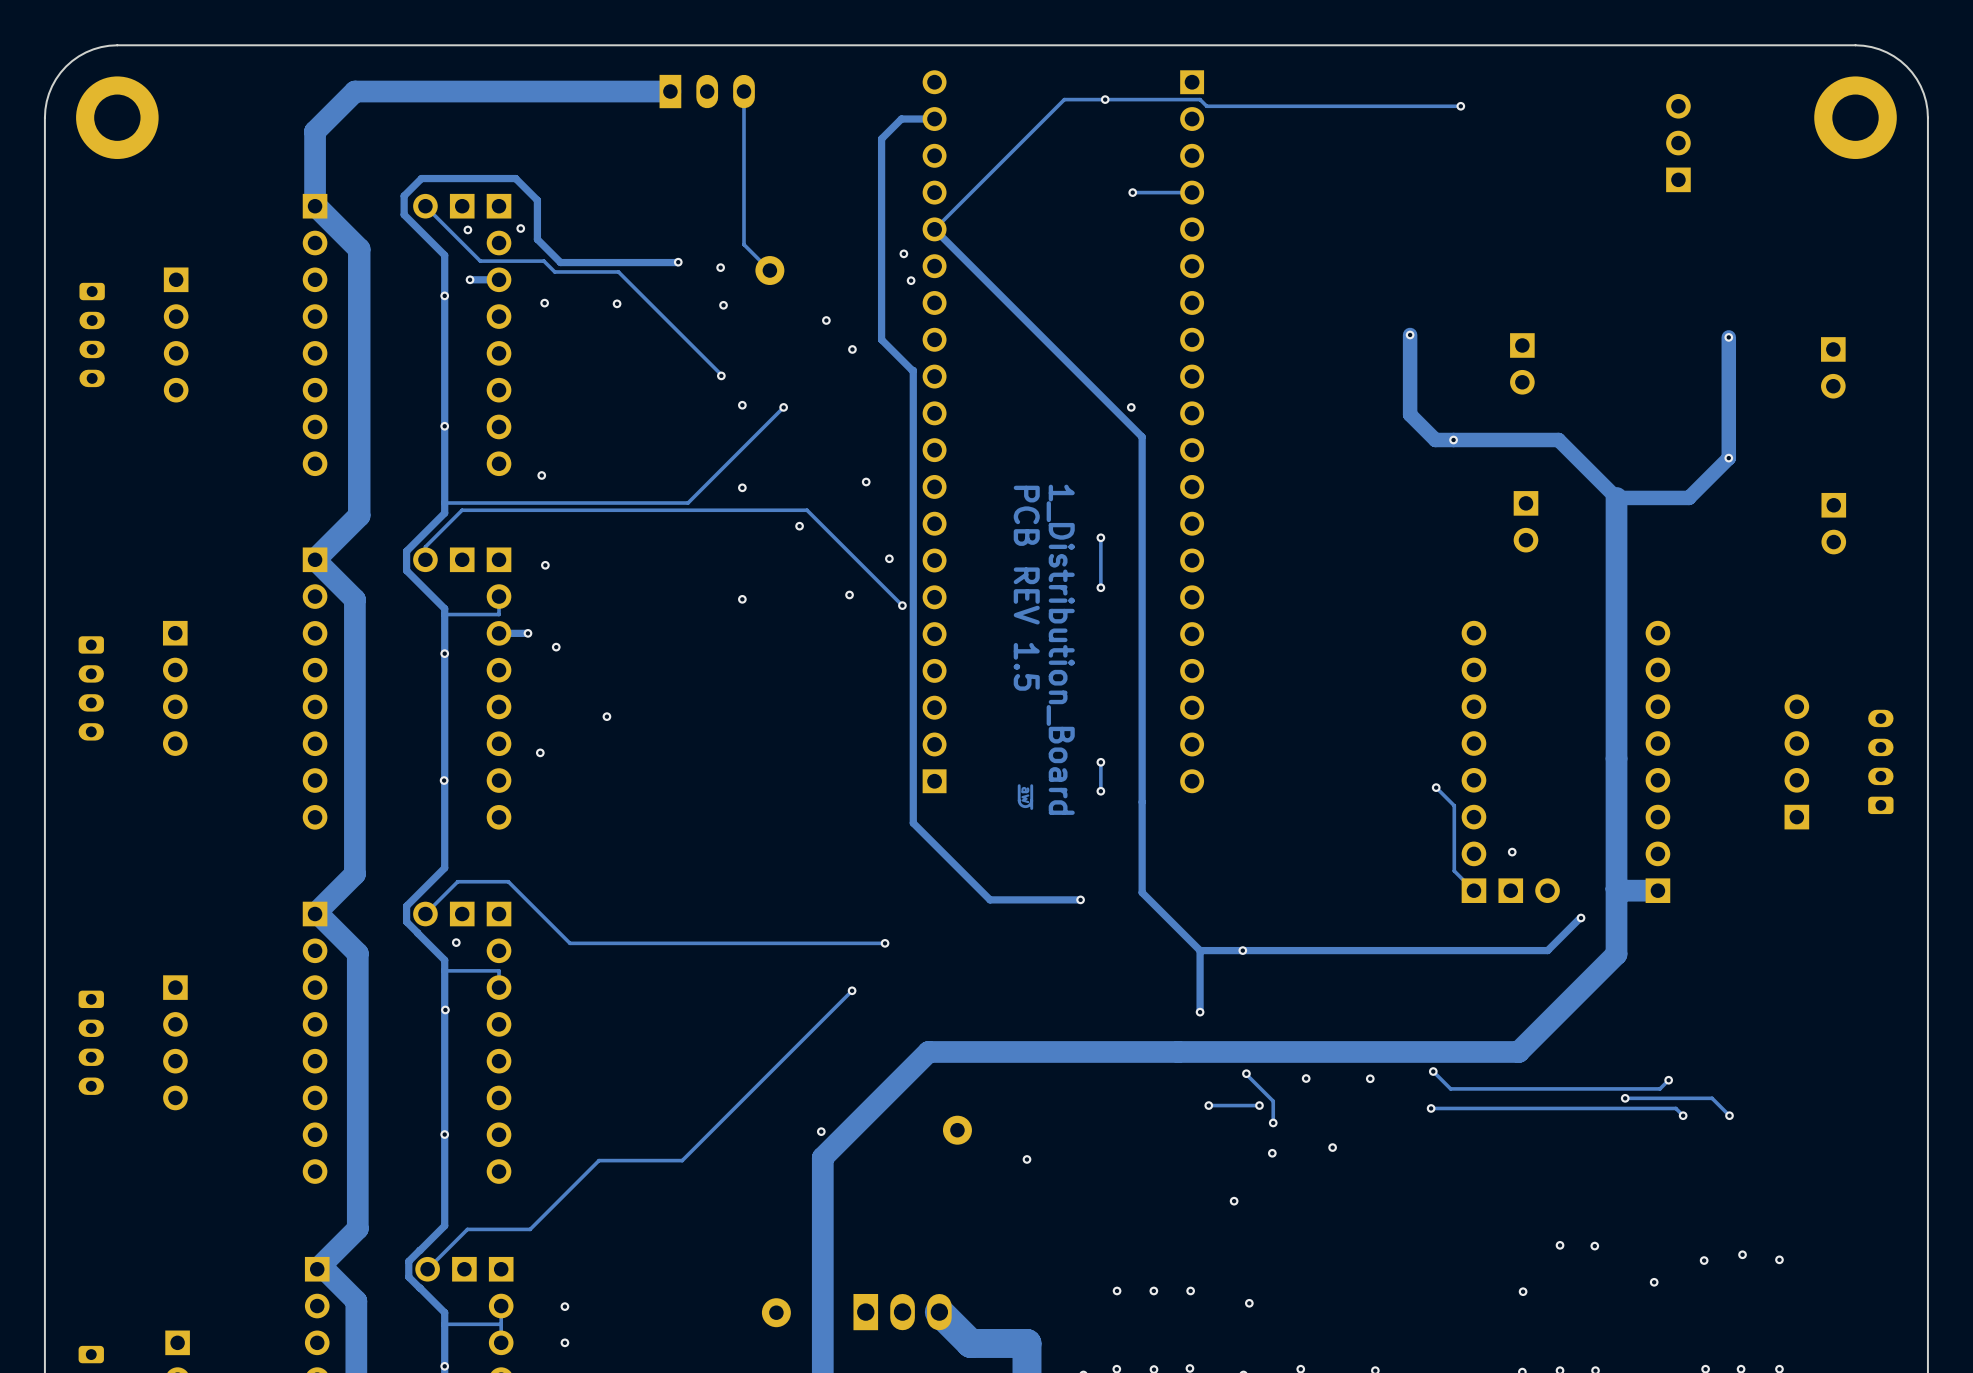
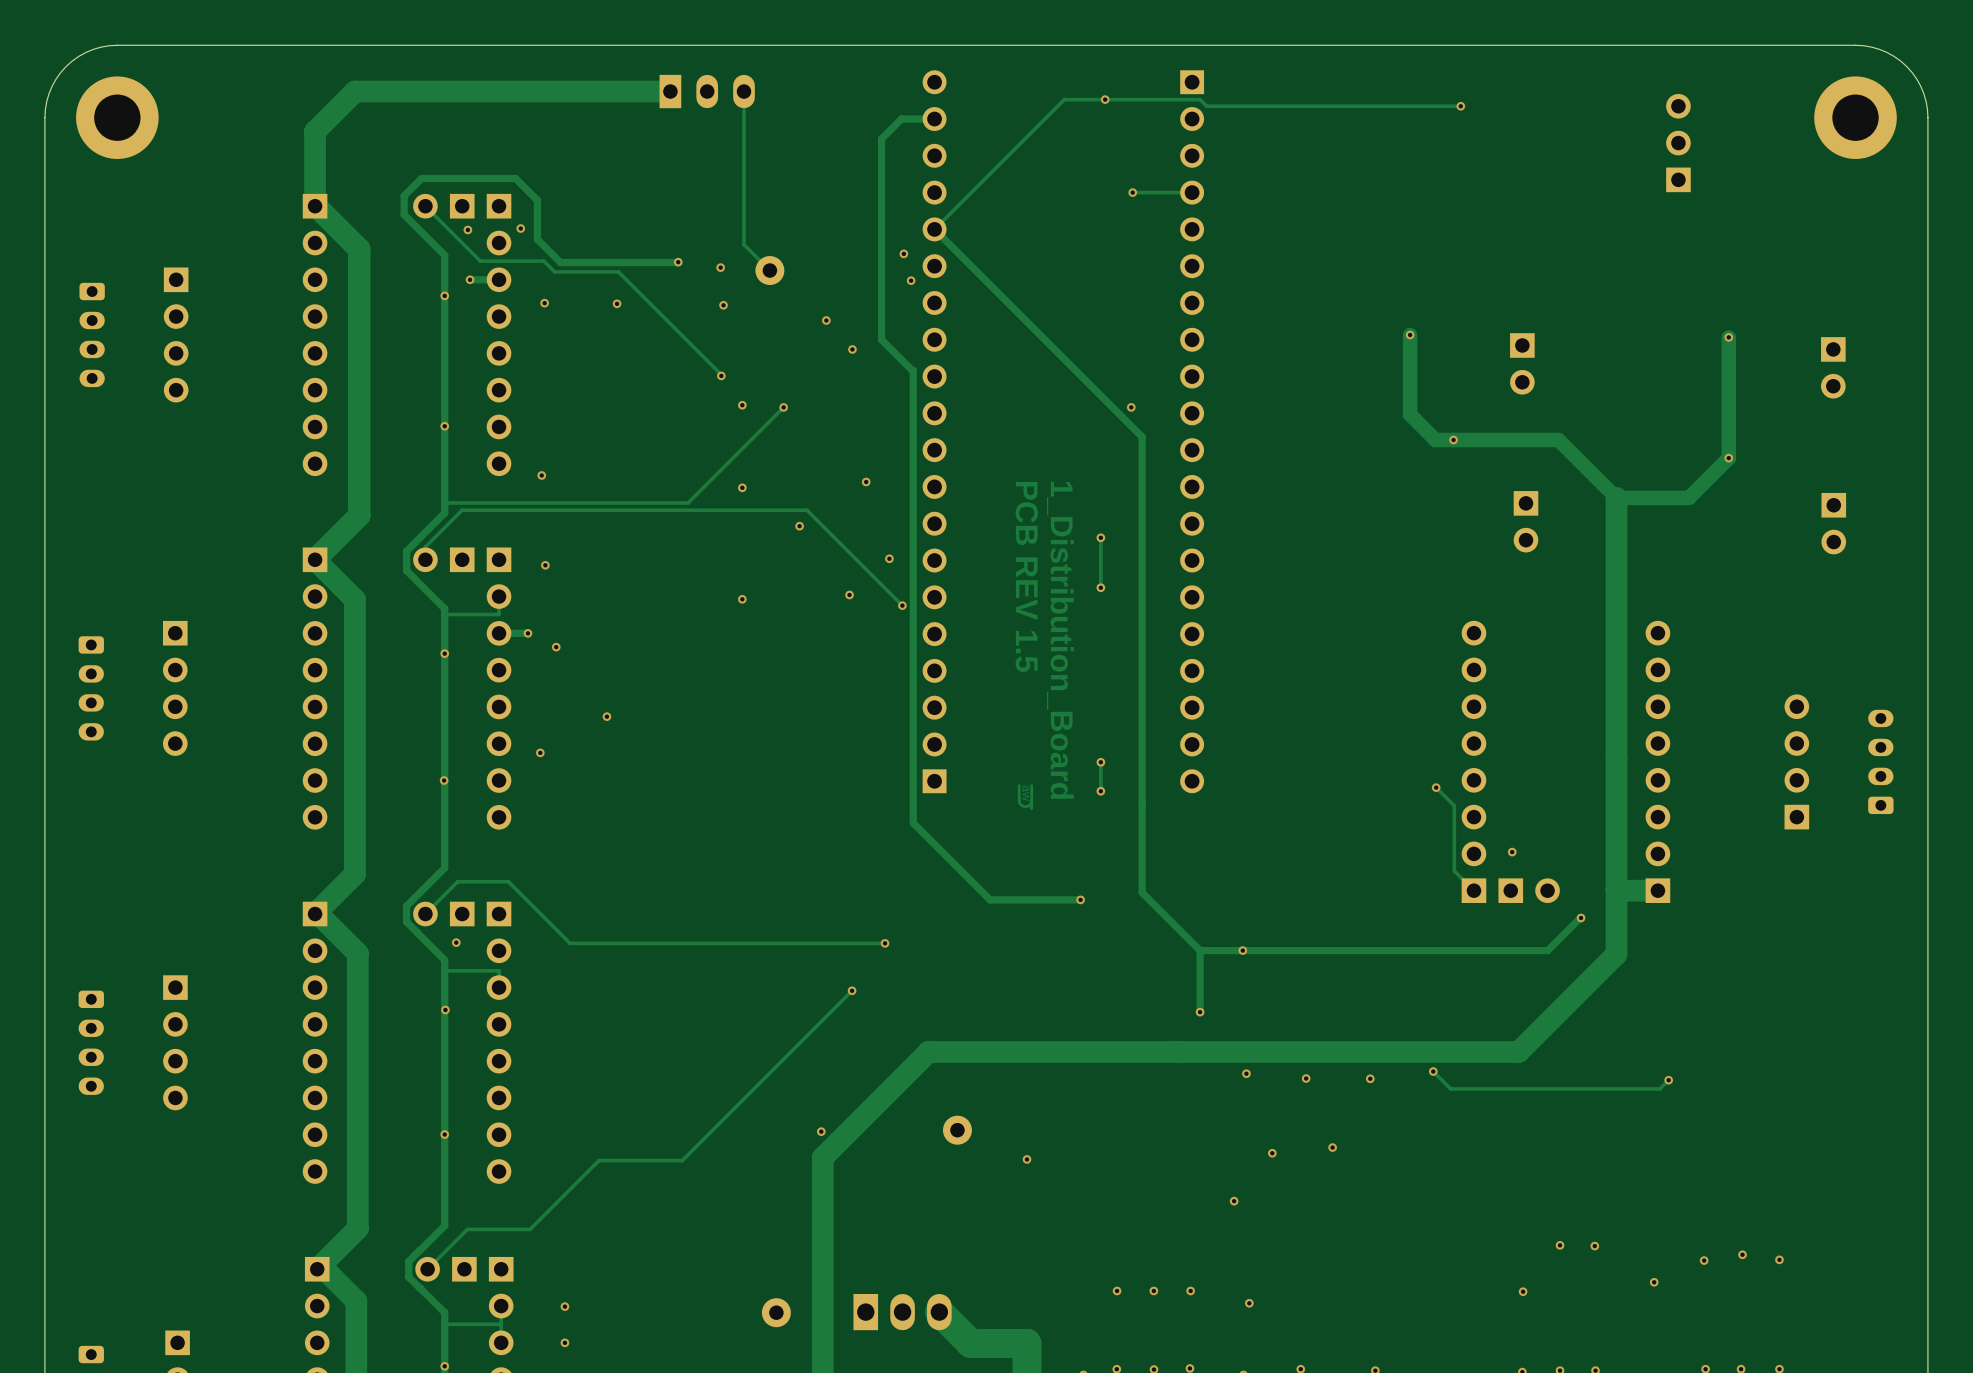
track: (1246, 1074) (1273, 1101) (1273, 1122) -> none
track: (1625, 1098) (1712, 1098) (1729, 1115) -> none
via: (1625, 1098) -> none
via: (1208, 1105) -> none
track: (1259, 1105) (1208, 1105) -> none
via: (1259, 1105) -> none
track: (1431, 1108) (1675, 1108) (1683, 1115) -> none
via: (1431, 1108) -> none
via: (1683, 1115) -> none
via: (1729, 1115) -> none
via: (1273, 1122) -> none

